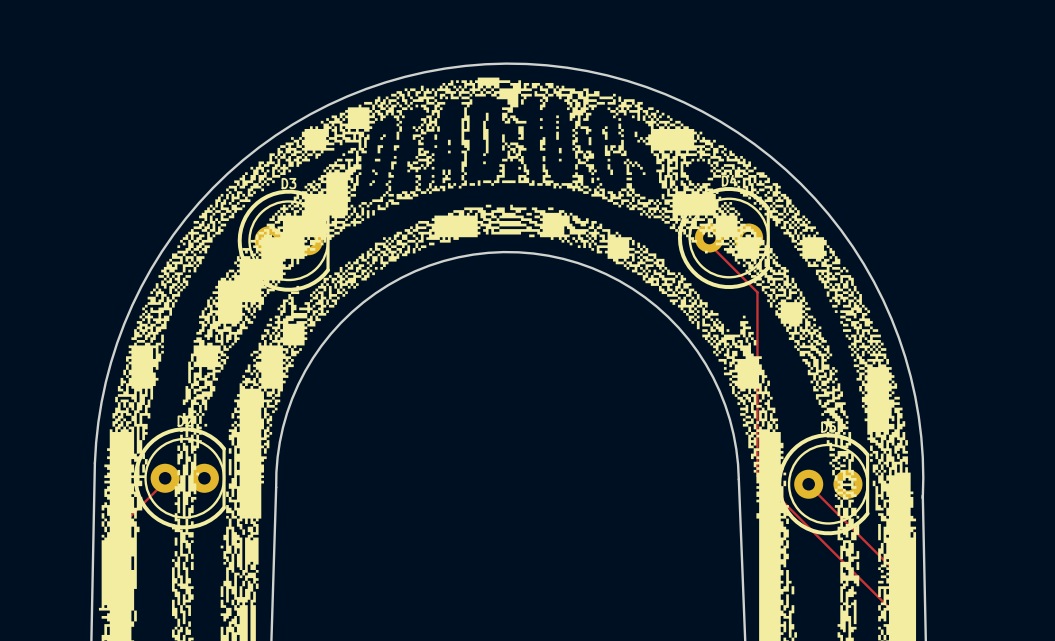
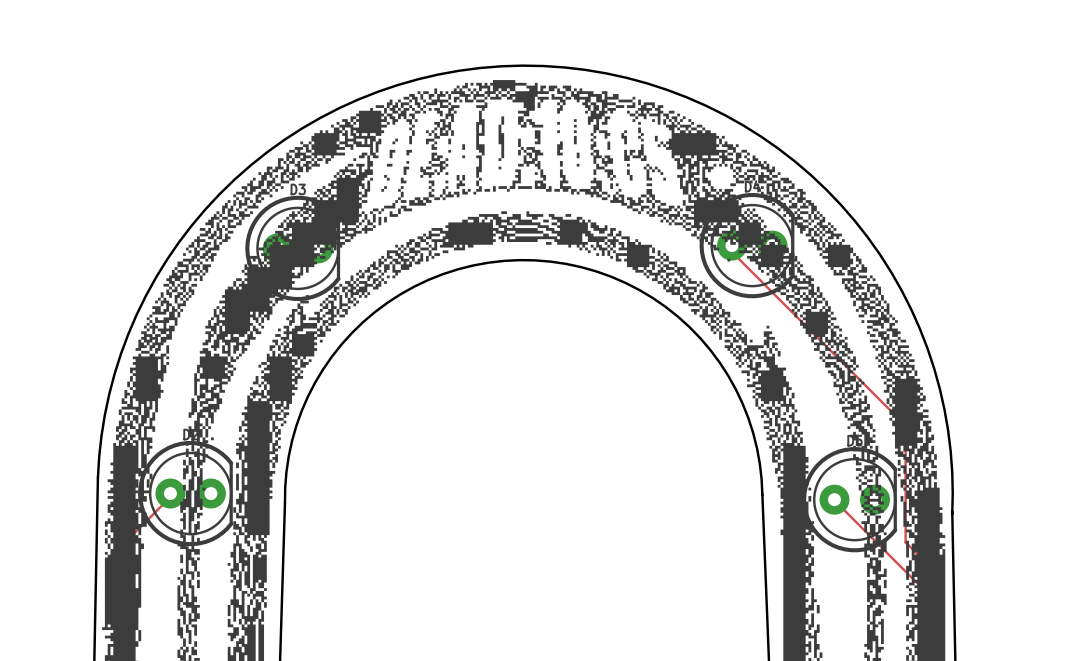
track: (757, 292) (757, 476) (891, 610) -> (781, 301) (905, 425) (905, 542) (934, 571) (934, 600)

